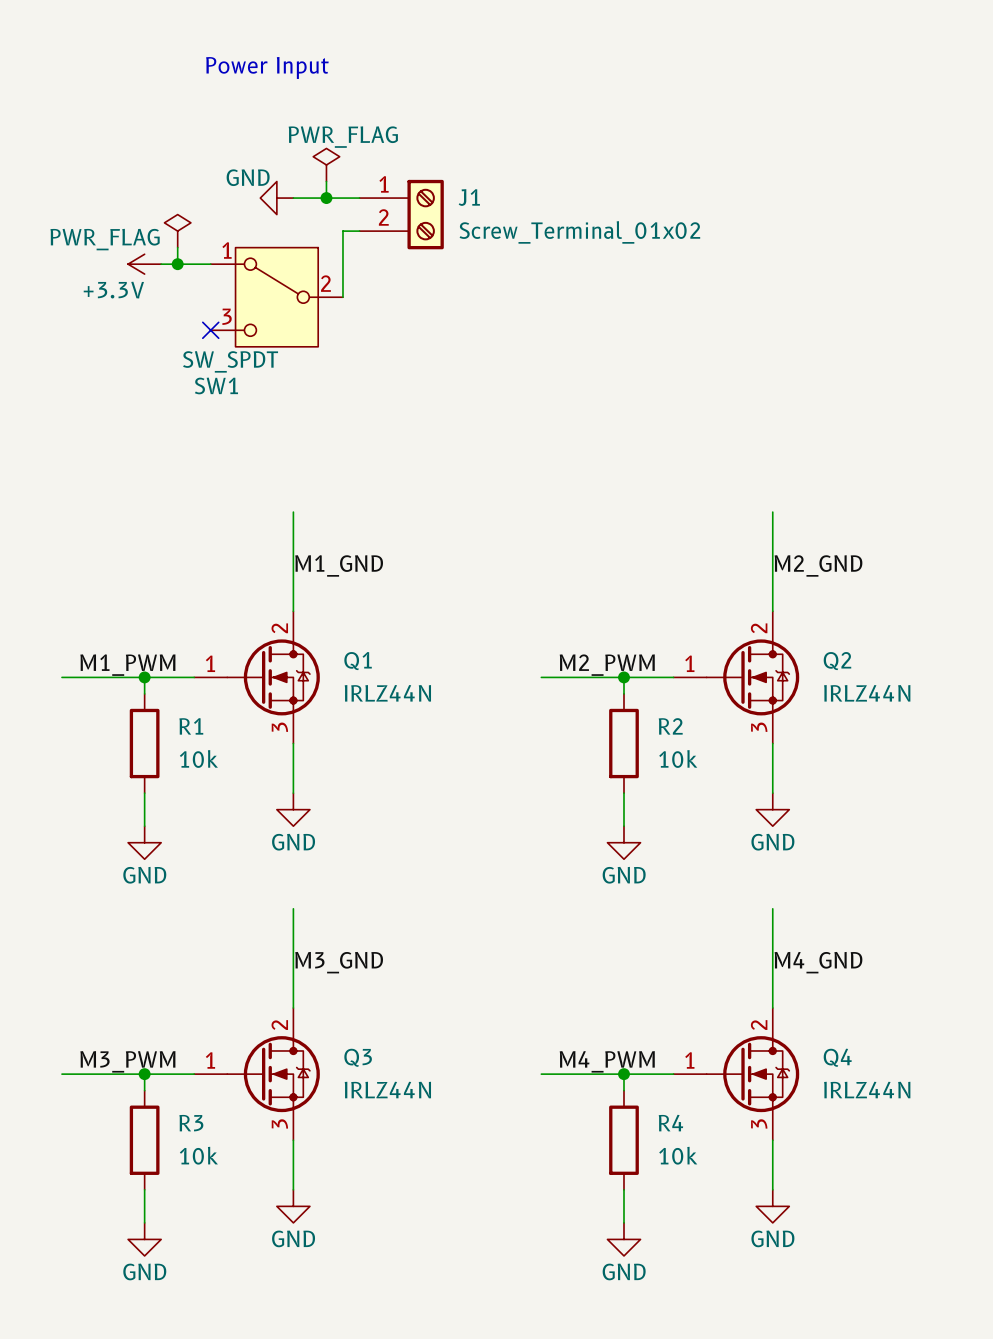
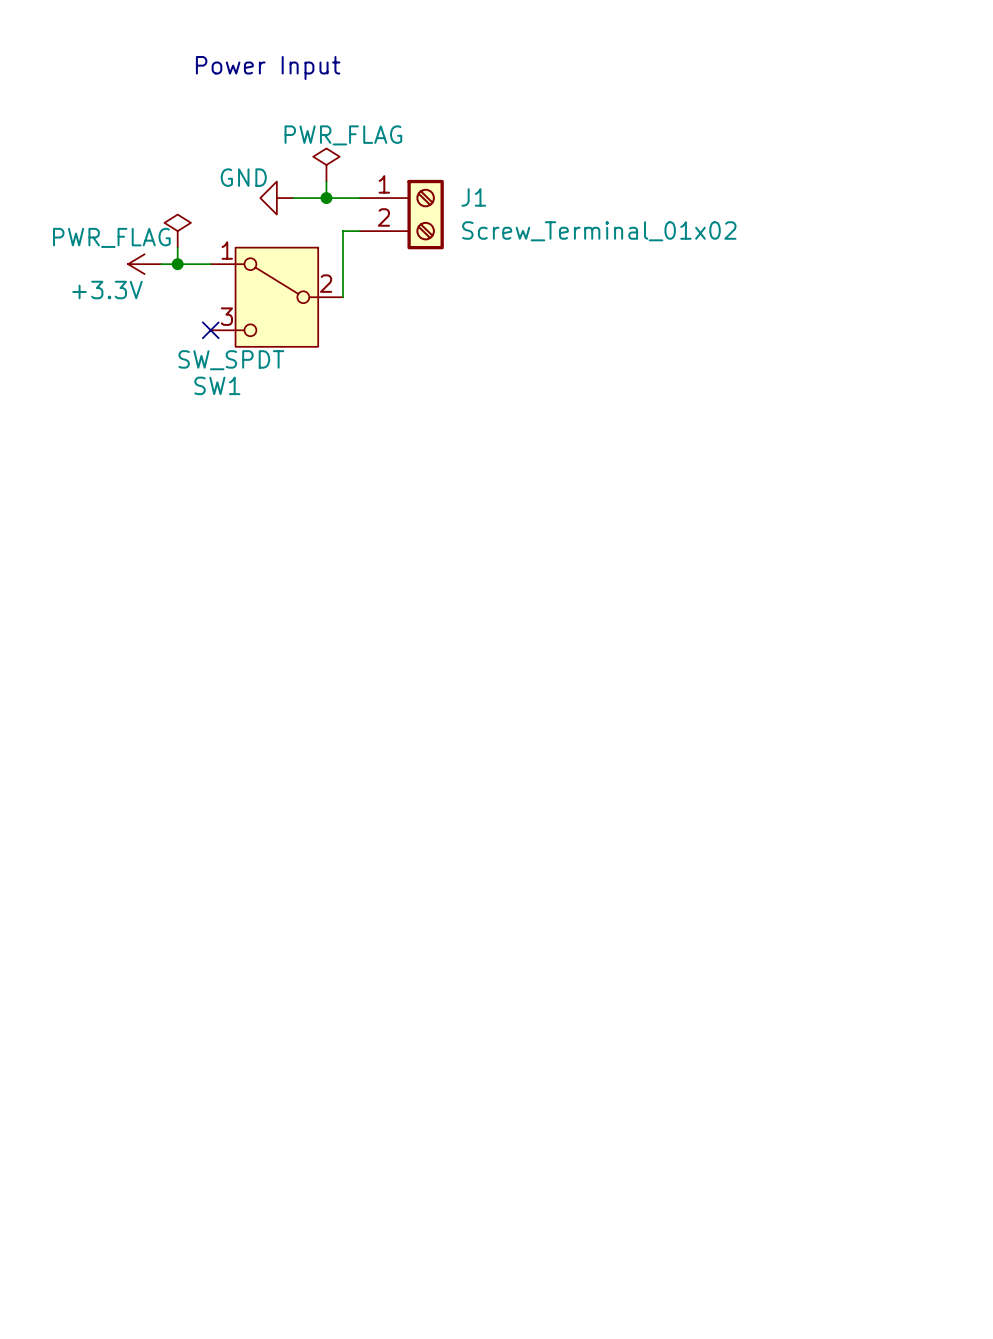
wire: (293, 512) (293, 611) -> none
wire: (772, 512) (772, 611) -> none
label: M1_GND (339, 565) -> none
label: M2_GND (818, 565) -> none
label: M1_PWM (127, 665) -> none
label: M2_PWM (607, 665) -> none
wire: (61, 677) (194, 677) -> none
wire: (144, 677) (144, 693) -> none
junction: (144, 677) -> none
Q1: IRLZ44N (257, 677) -> none
wire: (541, 677) (673, 677) -> none
wire: (623, 677) (623, 693) -> none
junction: (623, 677) -> none
Q2: IRLZ44N (736, 677) -> none
R1: 10k (144, 743) -> none
wire: (293, 743) (293, 793) -> none
R2: 10k (623, 743) -> none
wire: (772, 743) (772, 793) -> none
wire: (144, 793) (144, 826) -> none
wire: (623, 793) (623, 826) -> none
power symbol: GND (293, 809) -> none
power symbol: GND (772, 809) -> none
power symbol: GND (144, 842) -> none
power symbol: GND (623, 842) -> none
wire: (293, 908) (293, 1008) -> none
wire: (772, 908) (772, 1008) -> none
label: M3_GND (339, 962) -> none
label: M4_GND (818, 962) -> none
label: M3_PWM (127, 1061) -> none
label: M4_PWM (607, 1061) -> none
wire: (61, 1074) (194, 1074) -> none
wire: (144, 1074) (144, 1090) -> none
junction: (144, 1074) -> none
Q3: IRLZ44N (257, 1074) -> none
wire: (541, 1074) (673, 1074) -> none
wire: (623, 1074) (623, 1090) -> none
junction: (623, 1074) -> none
Q4: IRLZ44N (736, 1074) -> none
R3: 10k (144, 1140) -> none
wire: (293, 1140) (293, 1189) -> none
R4: 10k (623, 1140) -> none
wire: (772, 1140) (772, 1189) -> none
wire: (144, 1189) (144, 1222) -> none
wire: (623, 1189) (623, 1222) -> none
power symbol: GND (293, 1206) -> none
power symbol: GND (772, 1206) -> none
power symbol: GND (144, 1239) -> none
power symbol: GND (623, 1239) -> none

